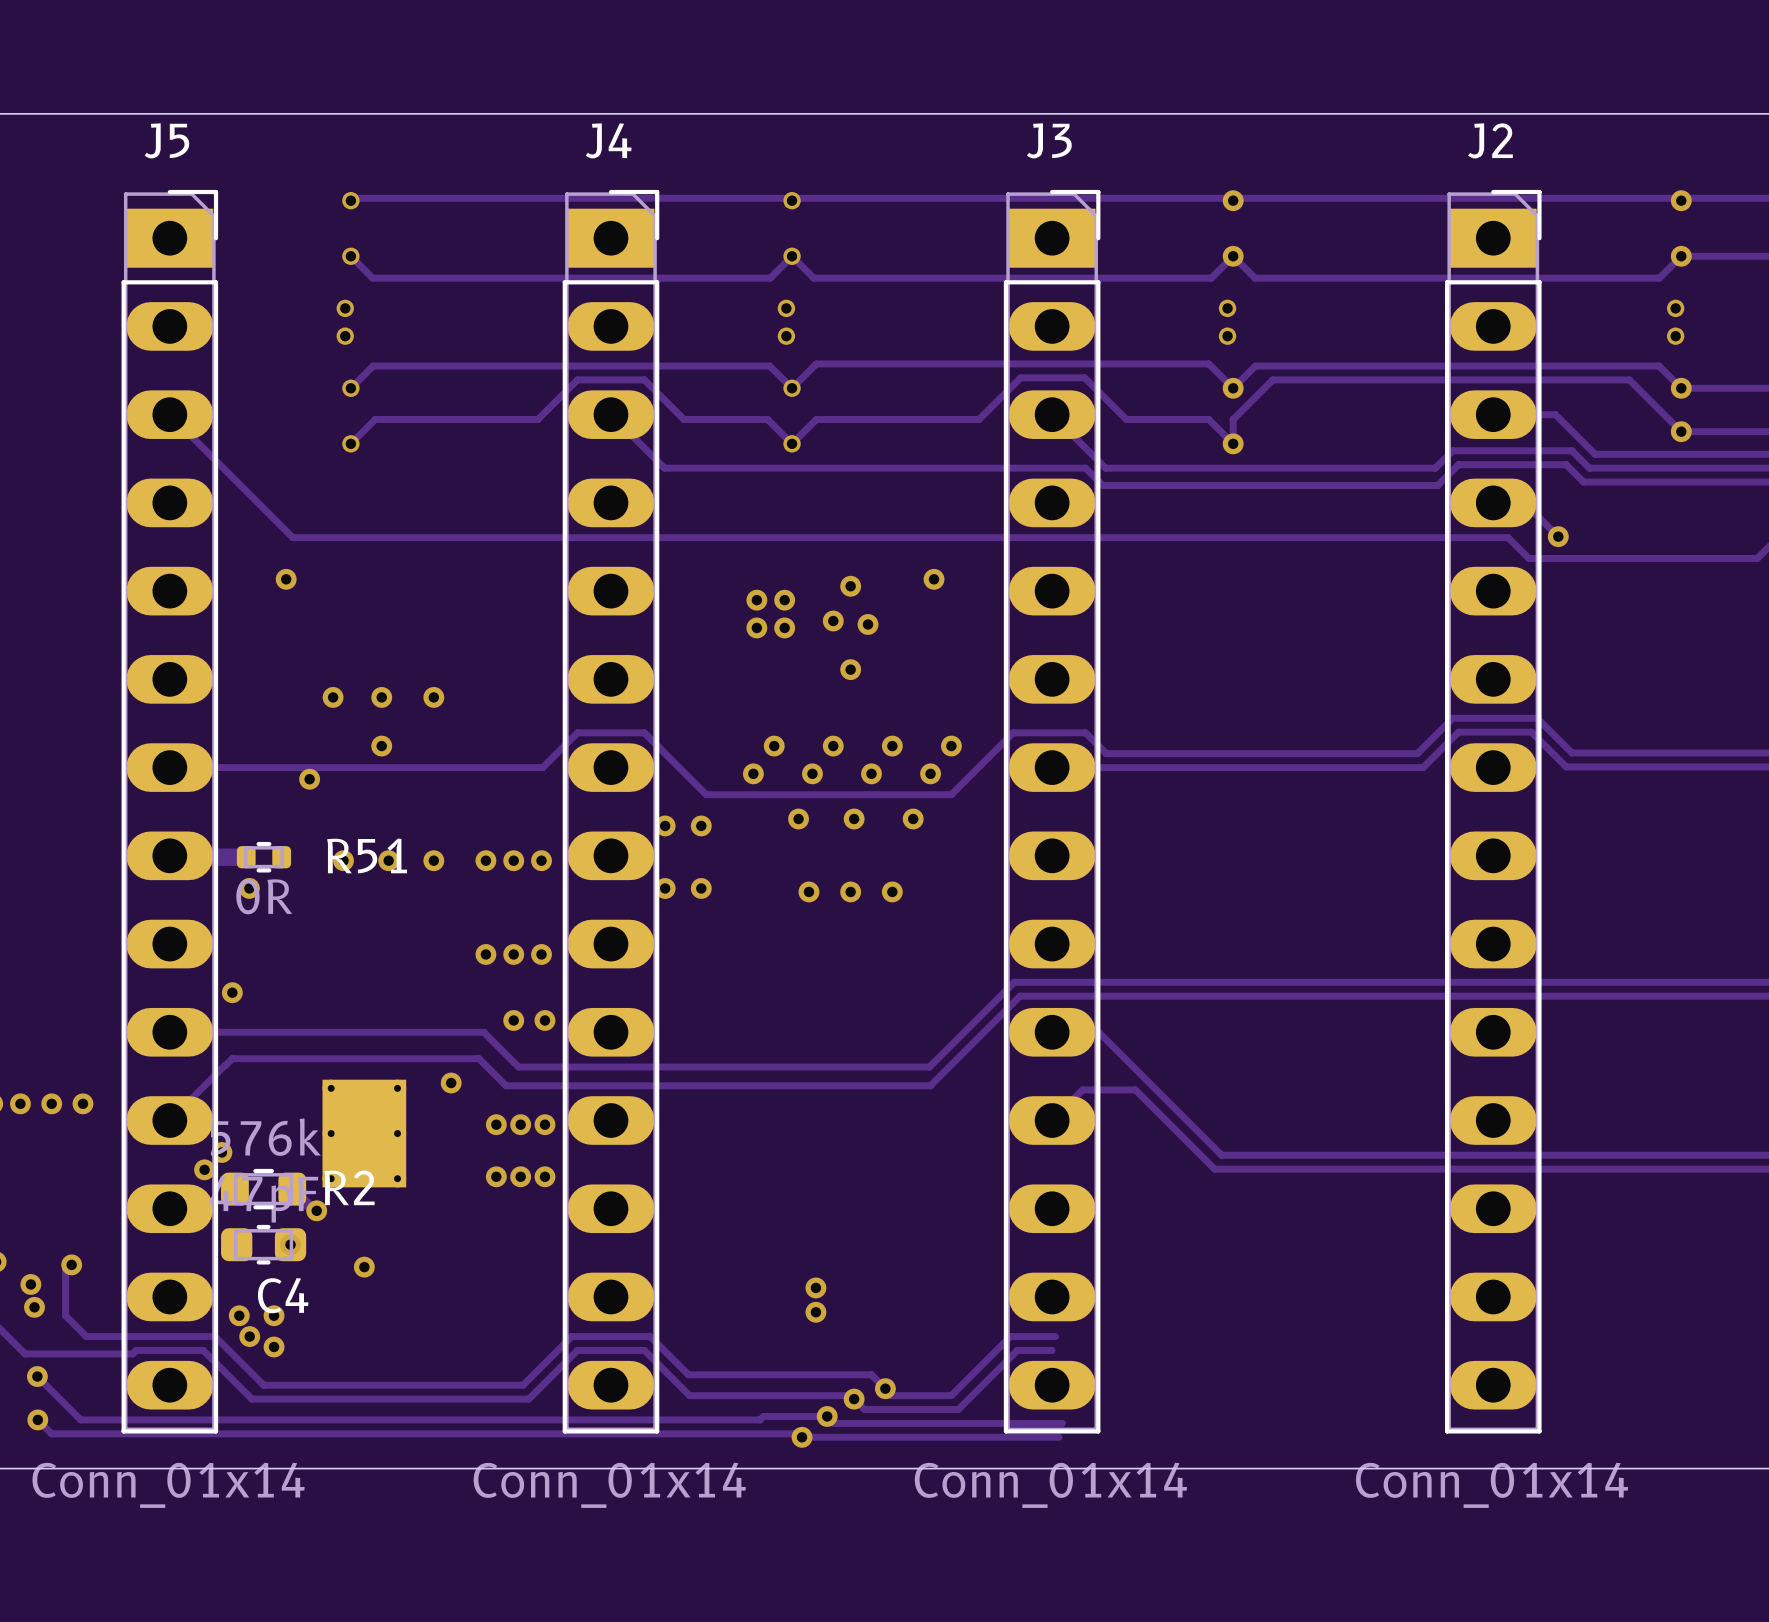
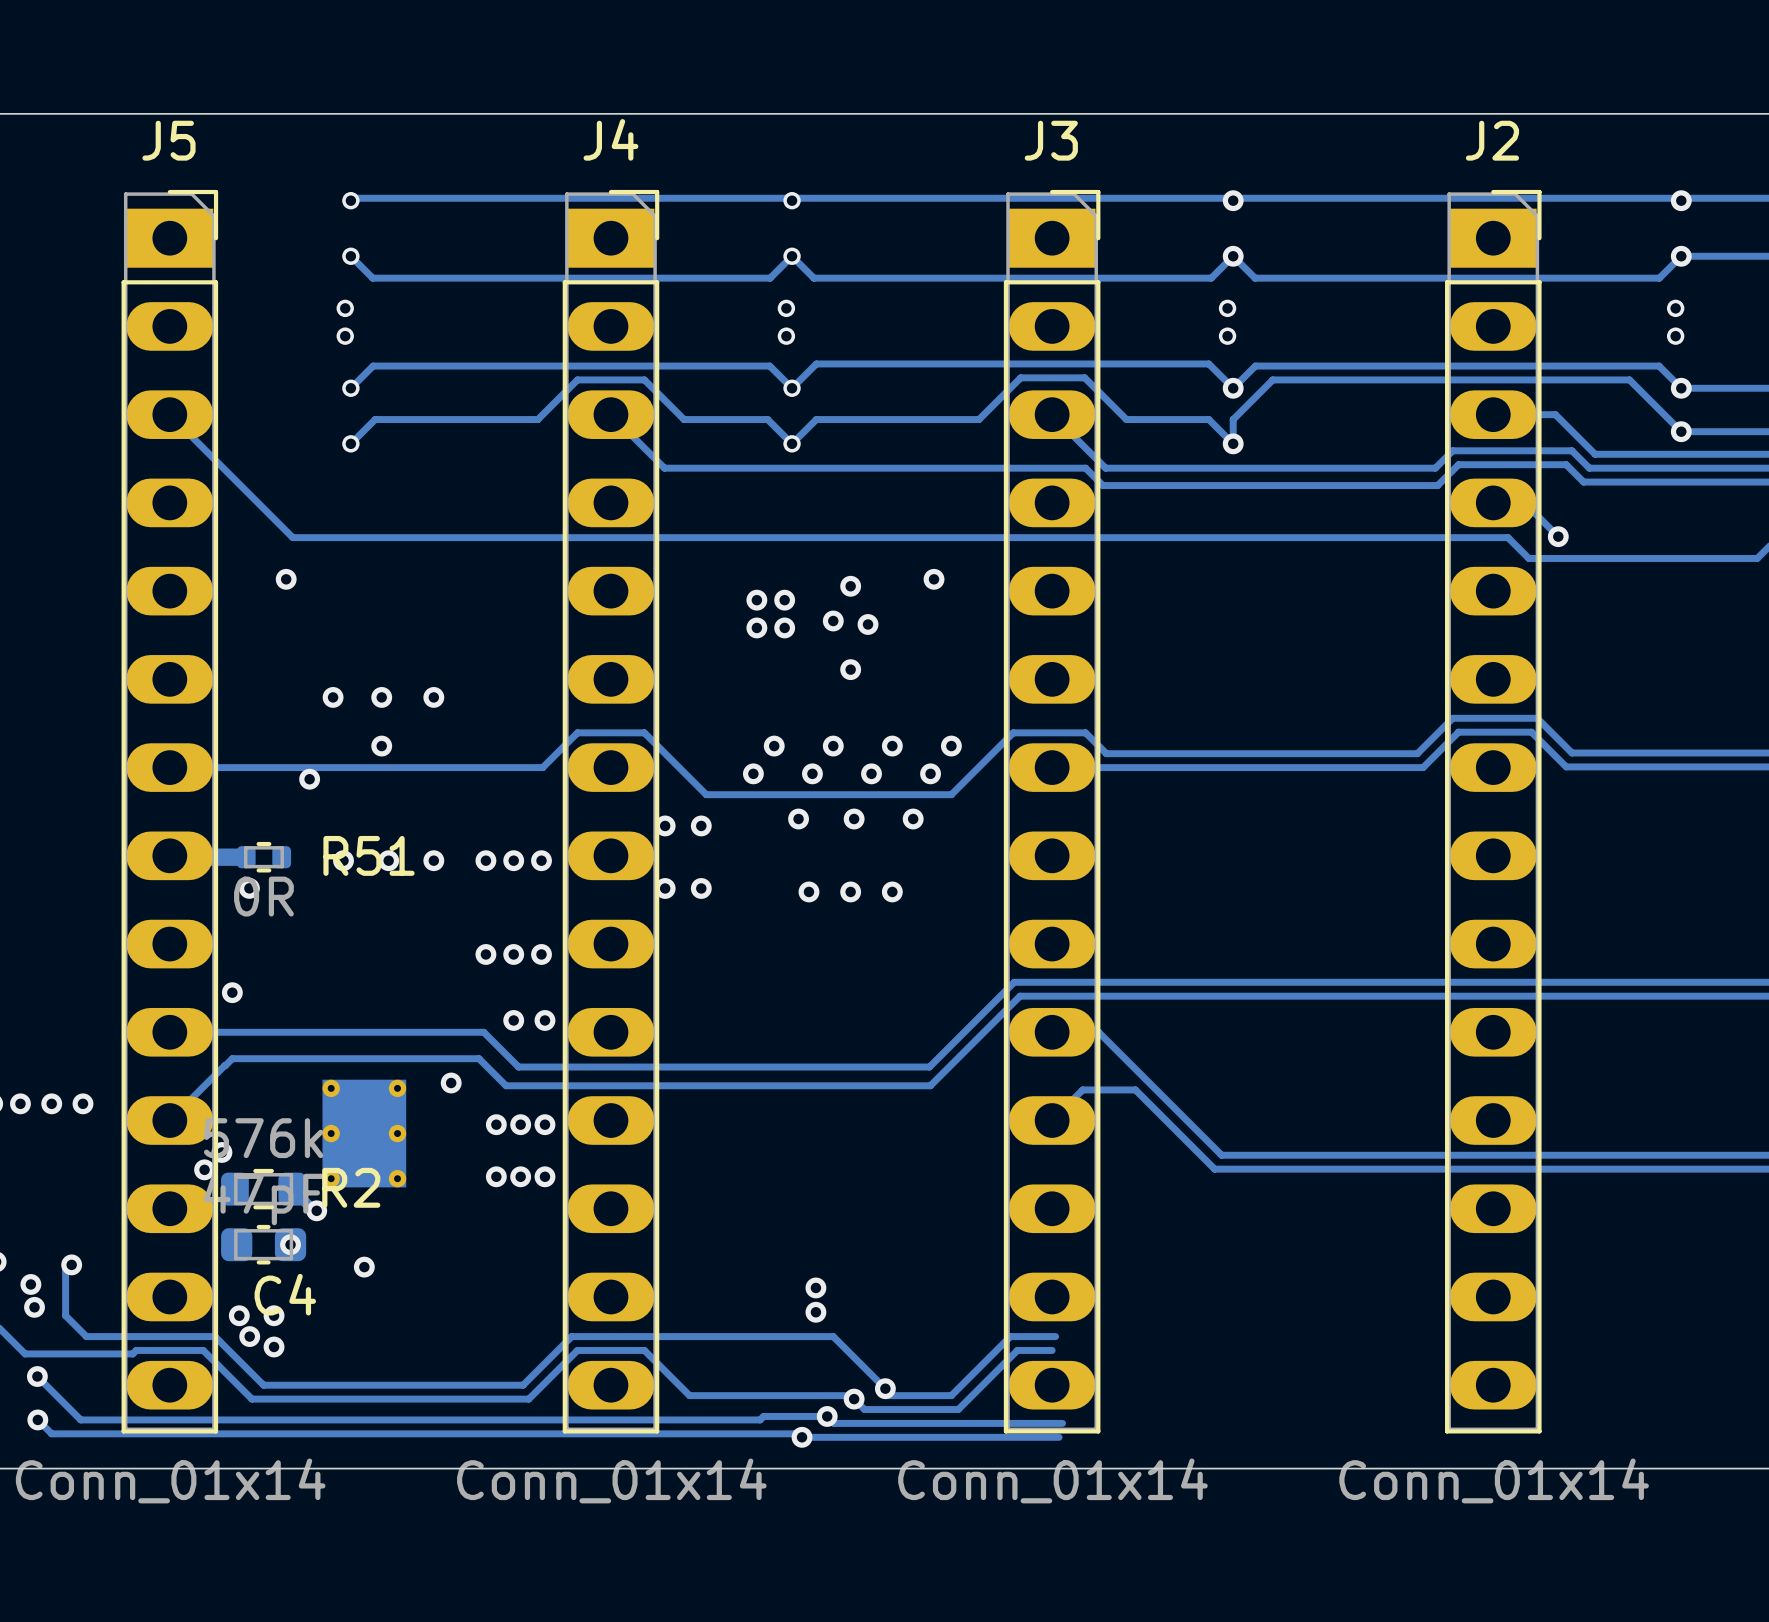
track: (650, 1336) (688, 1374) (871, 1374) -> (650, 1336) (833, 1336) (871, 1374)

